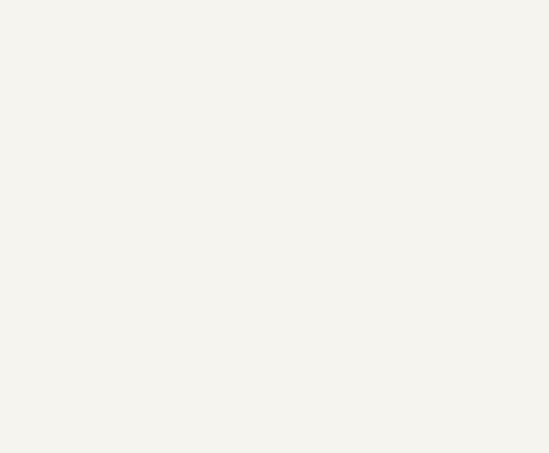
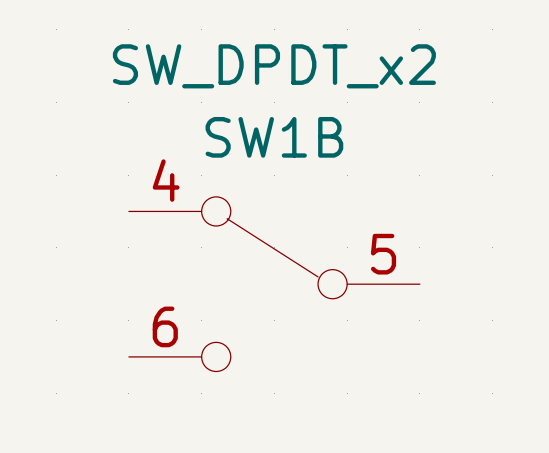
SW1B: none -> SW_DPDT_x2 (274, 284)

